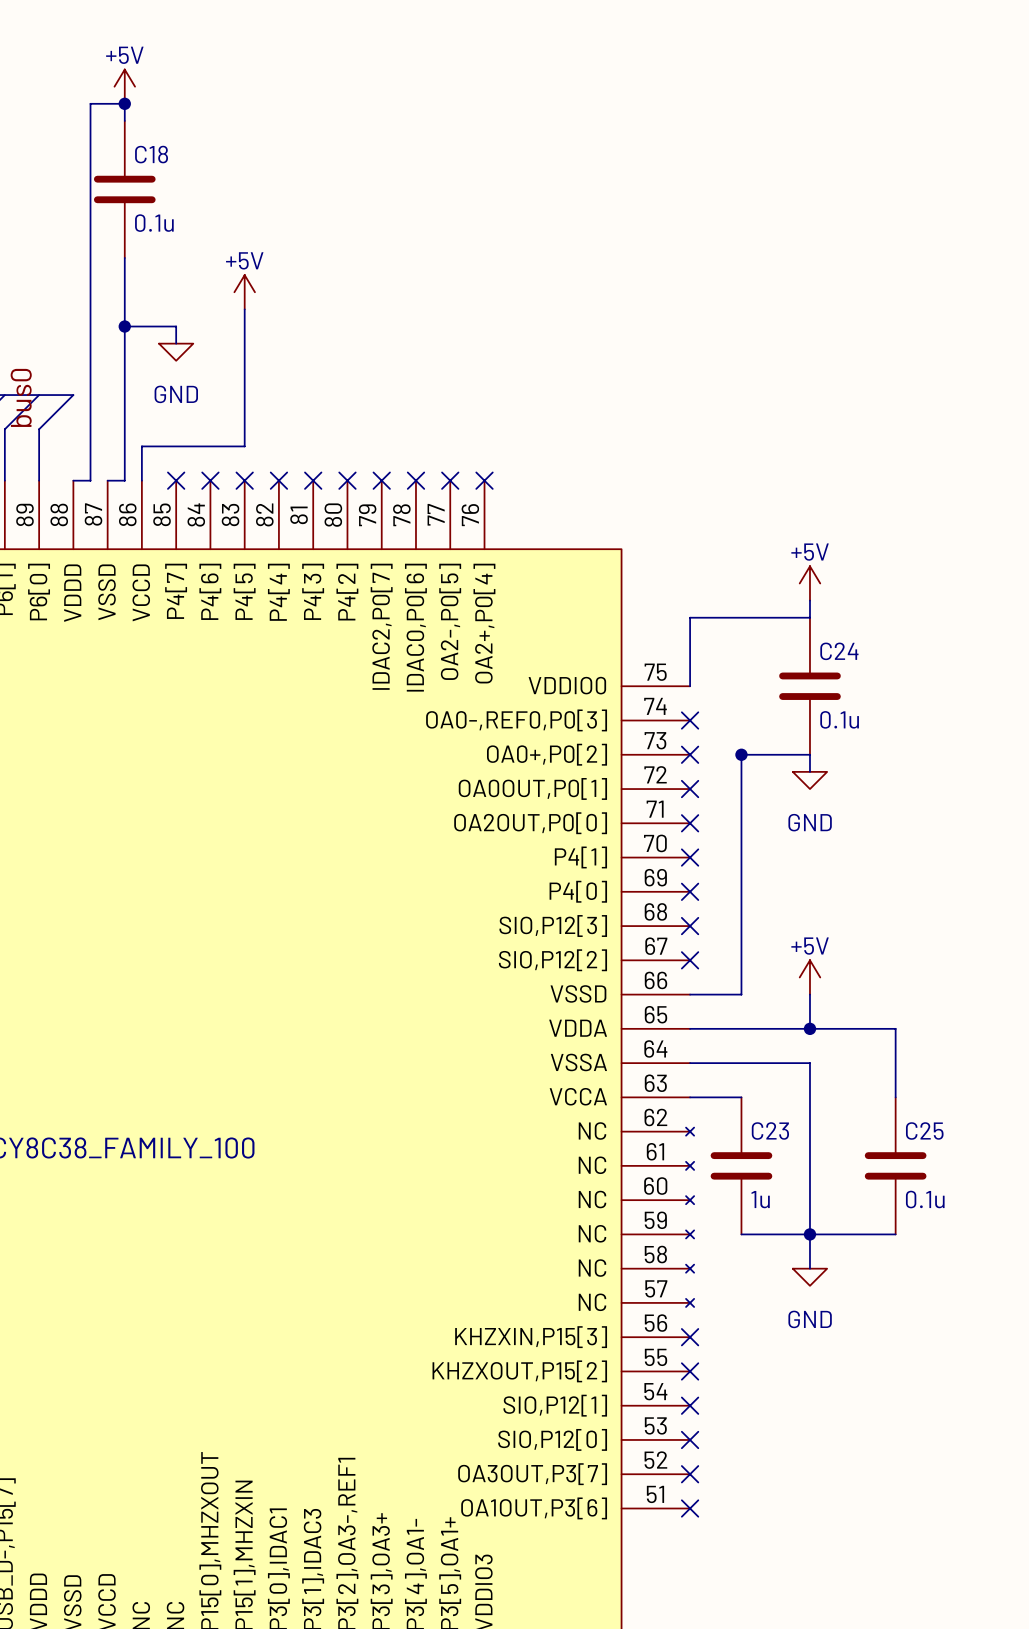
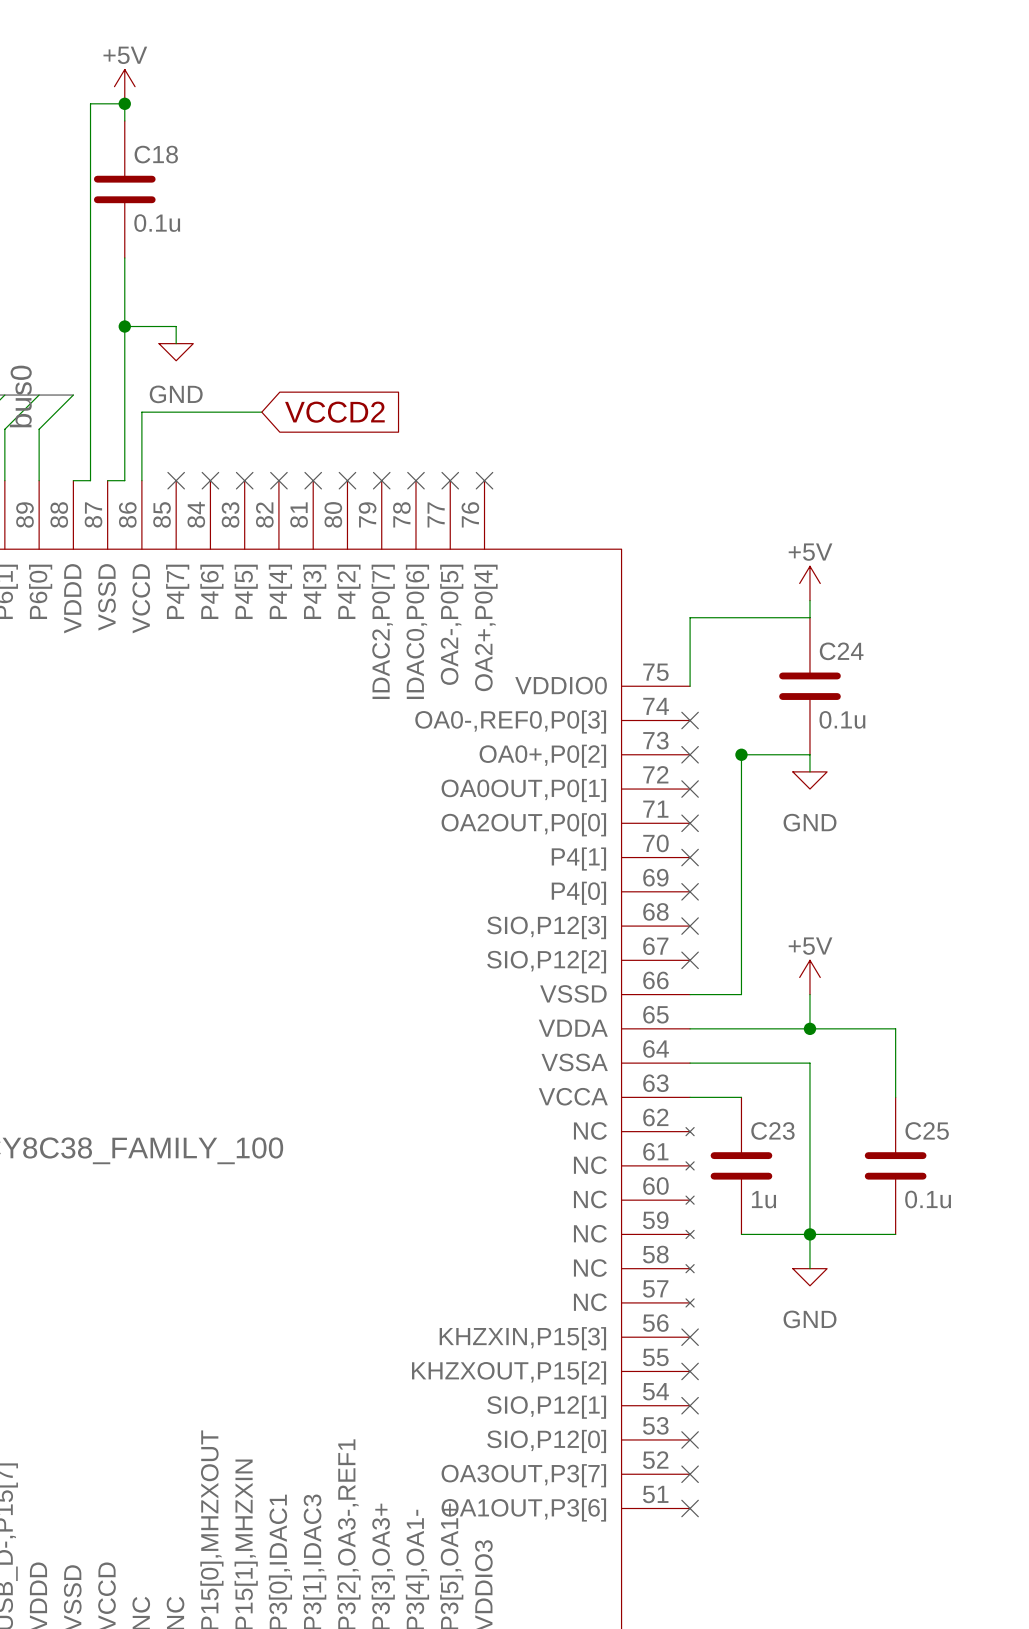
power symbol: +5V (244, 292) -> none
wire: (244, 309) (244, 446) (141, 446) -> (261, 412) (141, 412) (141, 446)
global label: none -> VCCD2 (334, 412)

